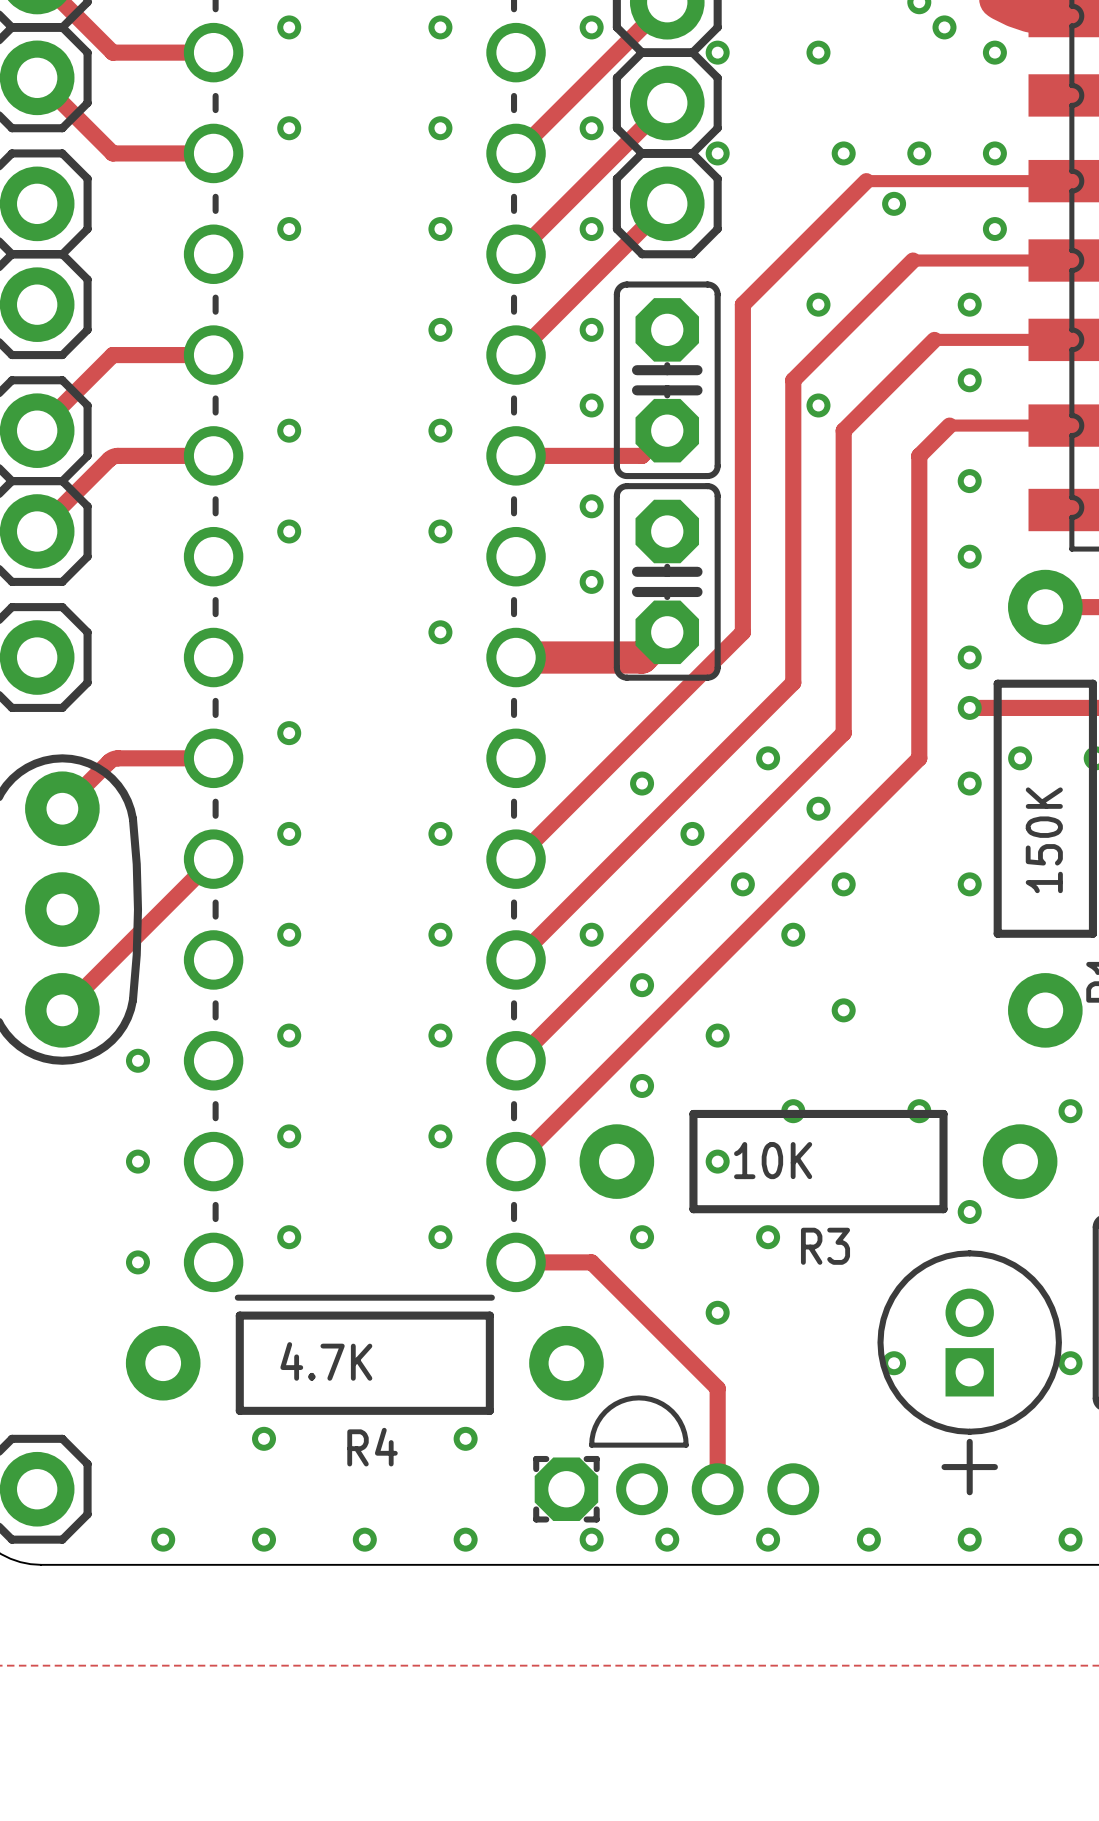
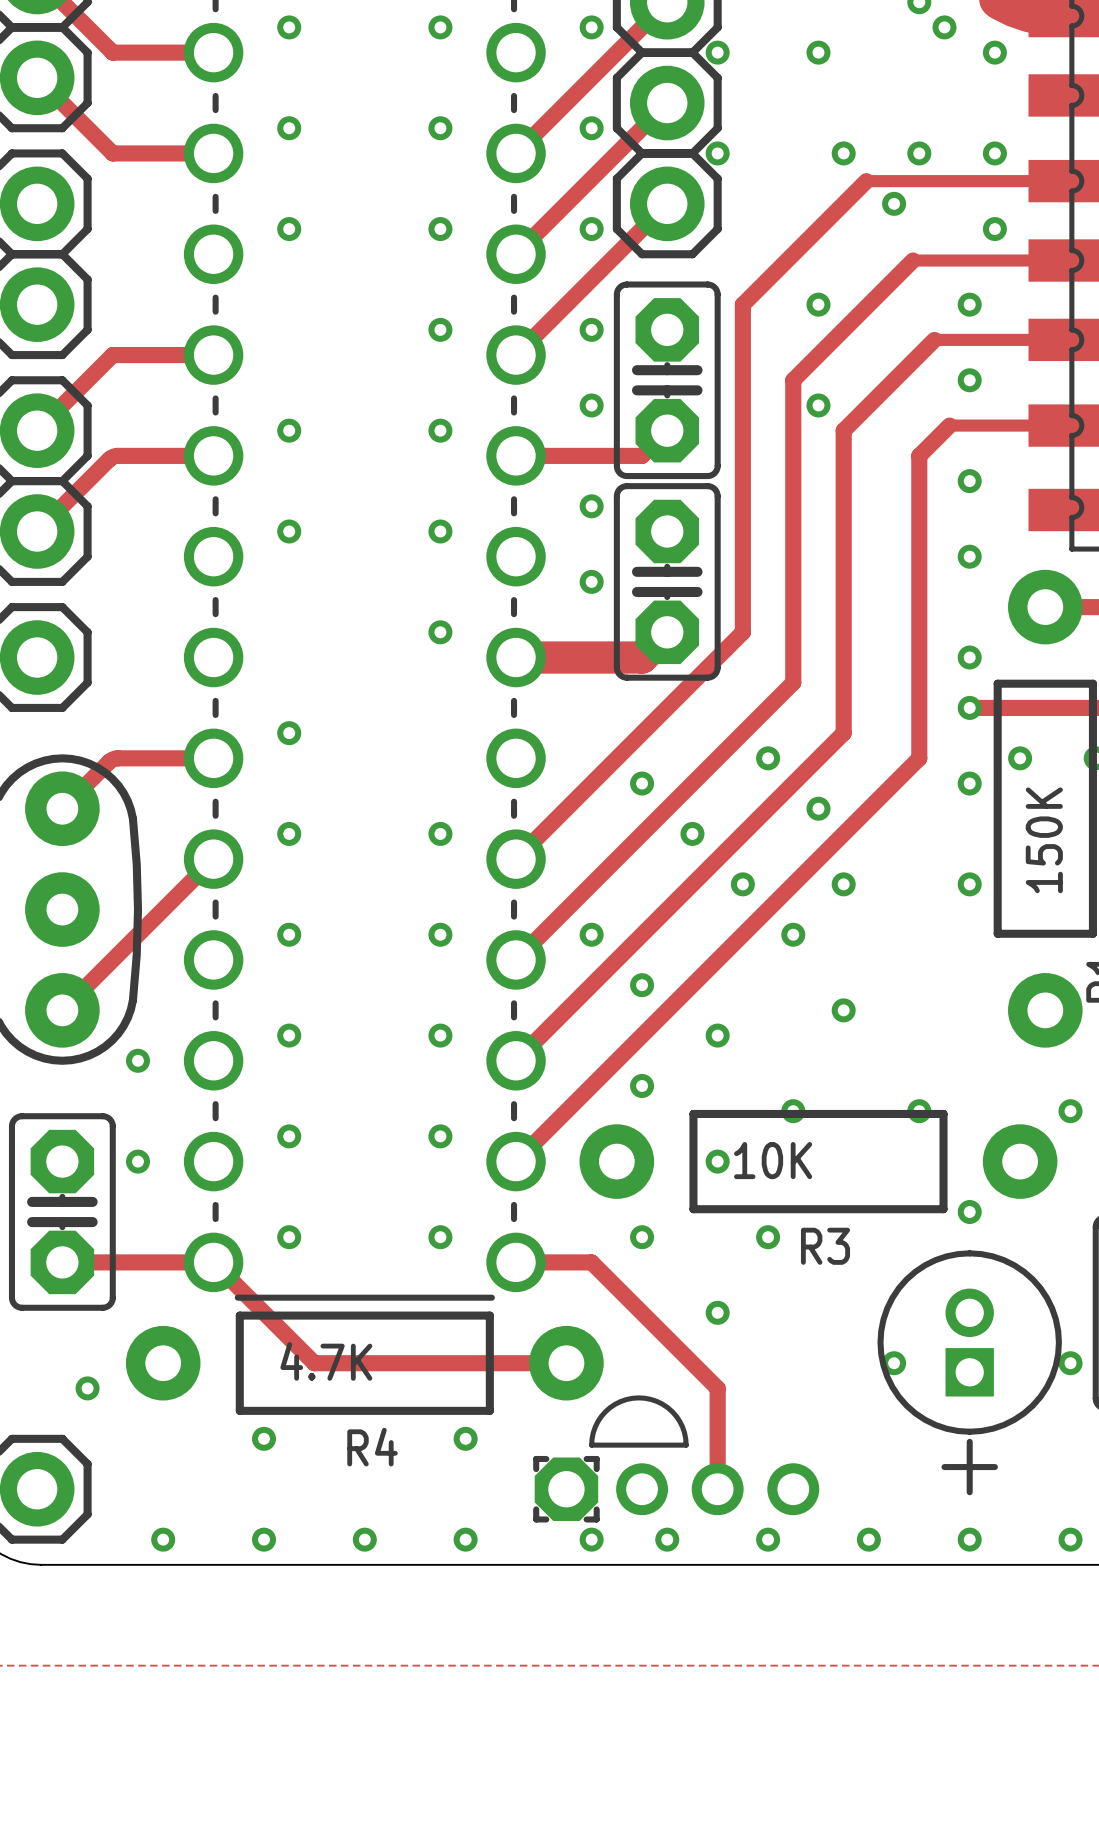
part: none -> (62, 1211)
track: none -> (62, 1262) (213, 1262) (314, 1363) (566, 1363)
via: (137, 1262) -> none
via: none -> (87, 1388)

